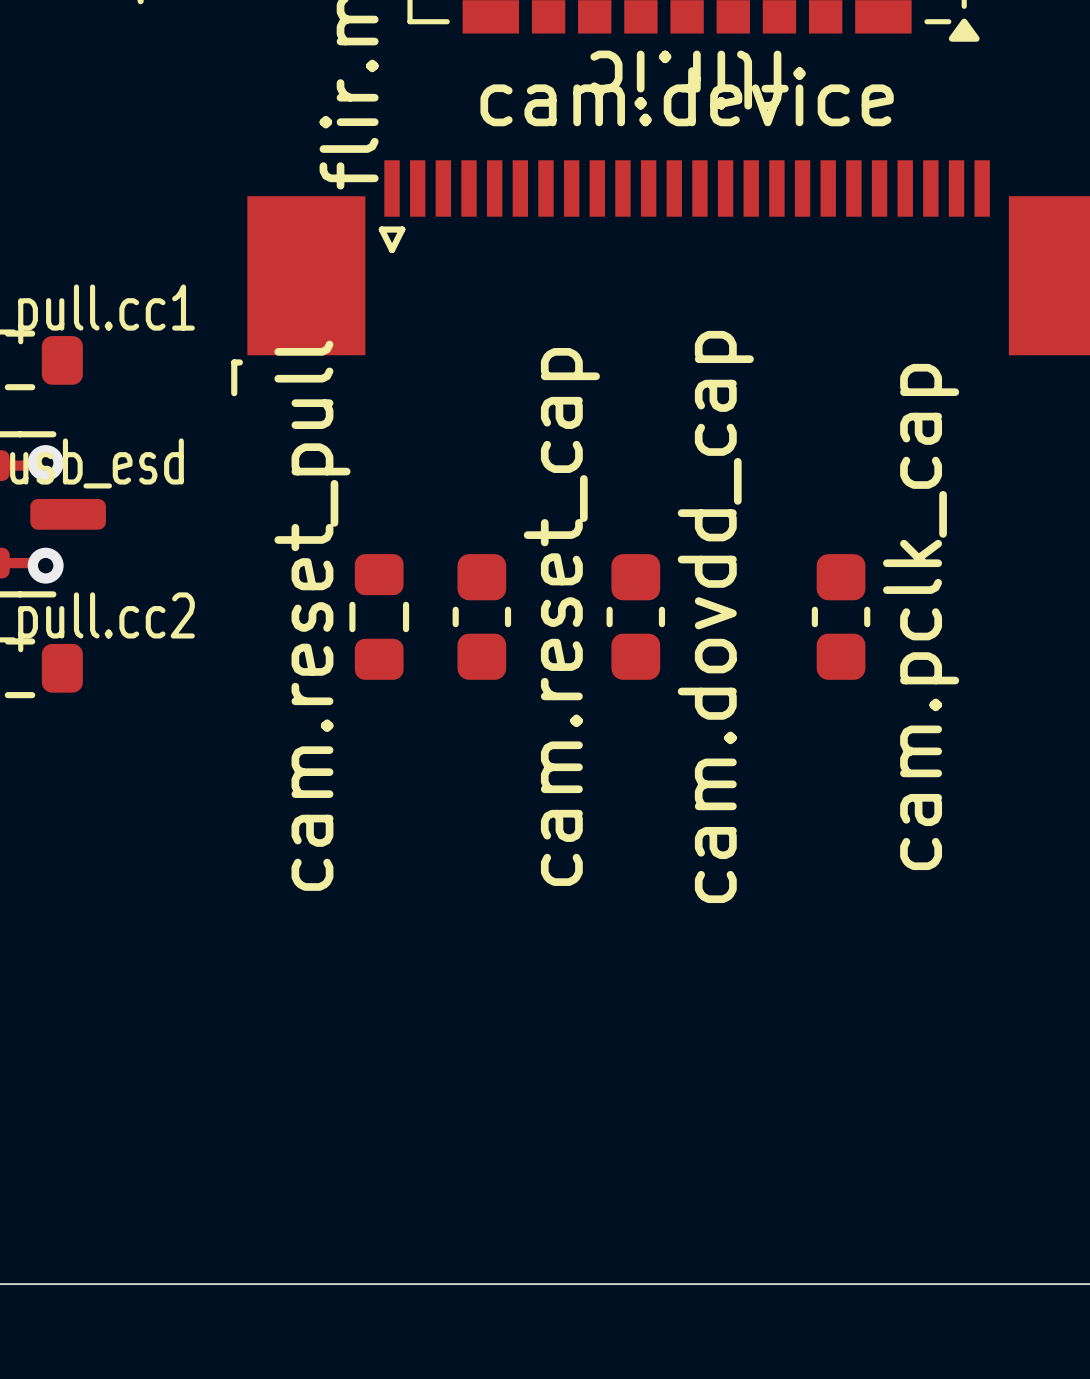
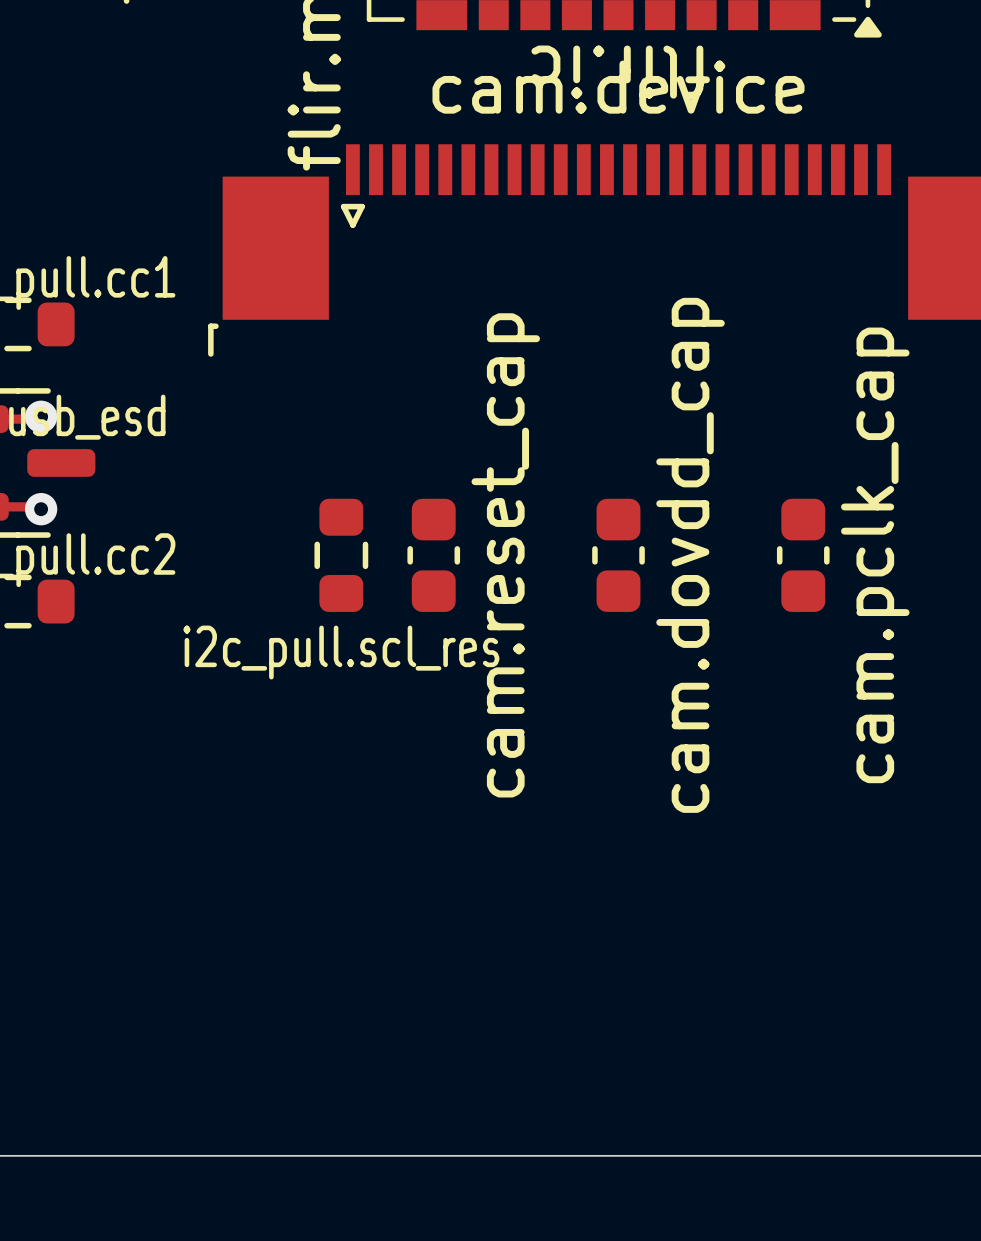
cam.reset_pull name: cam.reset_pull (312, 615) -> i2c_pull.scl_res (341, 652)
cam.dovdd_cap position: (635, 616) -> (618, 555)
cam.pclk_cap position: (841, 616) -> (803, 555)

